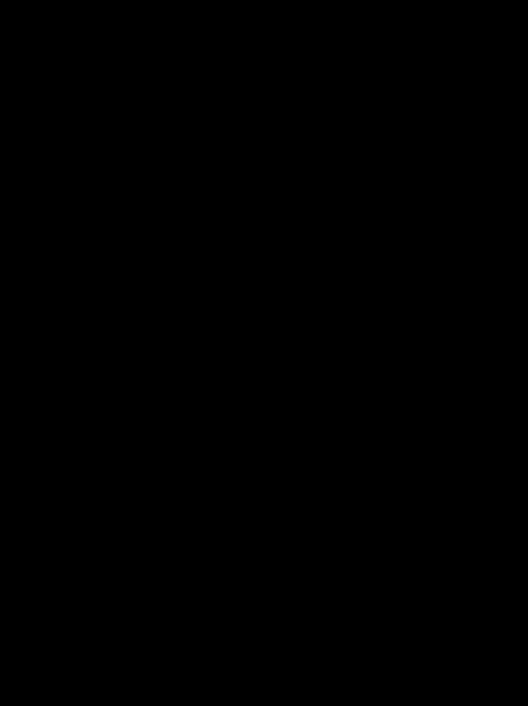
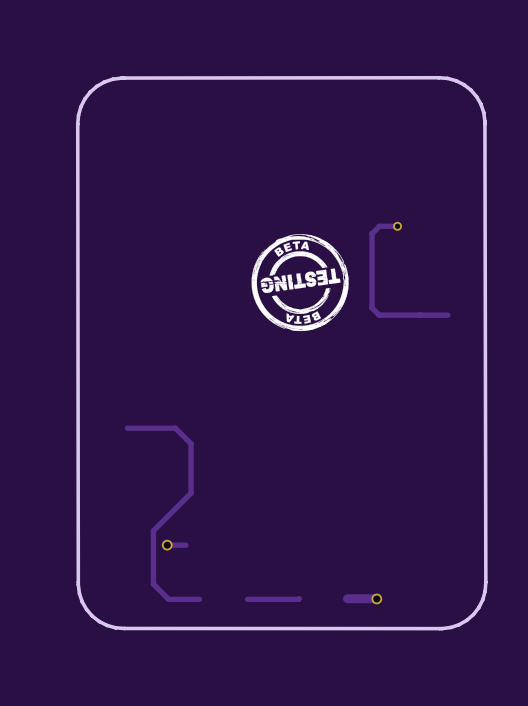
board edge: none -> (438, 77) (121, 78) (104, 82) (90, 92) (84, 99) (80, 106) (77, 124) (78, 584) (82, 601) (92, 616) (99, 621) (115, 627) (124, 628) (442, 628) (459, 624) (473, 614) (478, 607) (485, 591) (485, 582) (484, 121) (481, 104) (470, 90) (456, 80) (438, 77)
track: none -> (397, 226) (379, 226) (372, 233) (372, 307) (379, 315) (447, 315)
via: none -> (397, 226)
drawing: none -> [251, 234, 349, 332]
track: none -> (127, 428) (175, 428) (191, 443) (191, 493) (153, 530) (153, 584) (168, 599) (199, 599)
track: none -> (167, 545) (185, 545)
via: none -> (167, 545)
track: none -> (299, 598) (247, 599)
track: none -> (347, 598) (376, 598)
via: none -> (376, 598)

